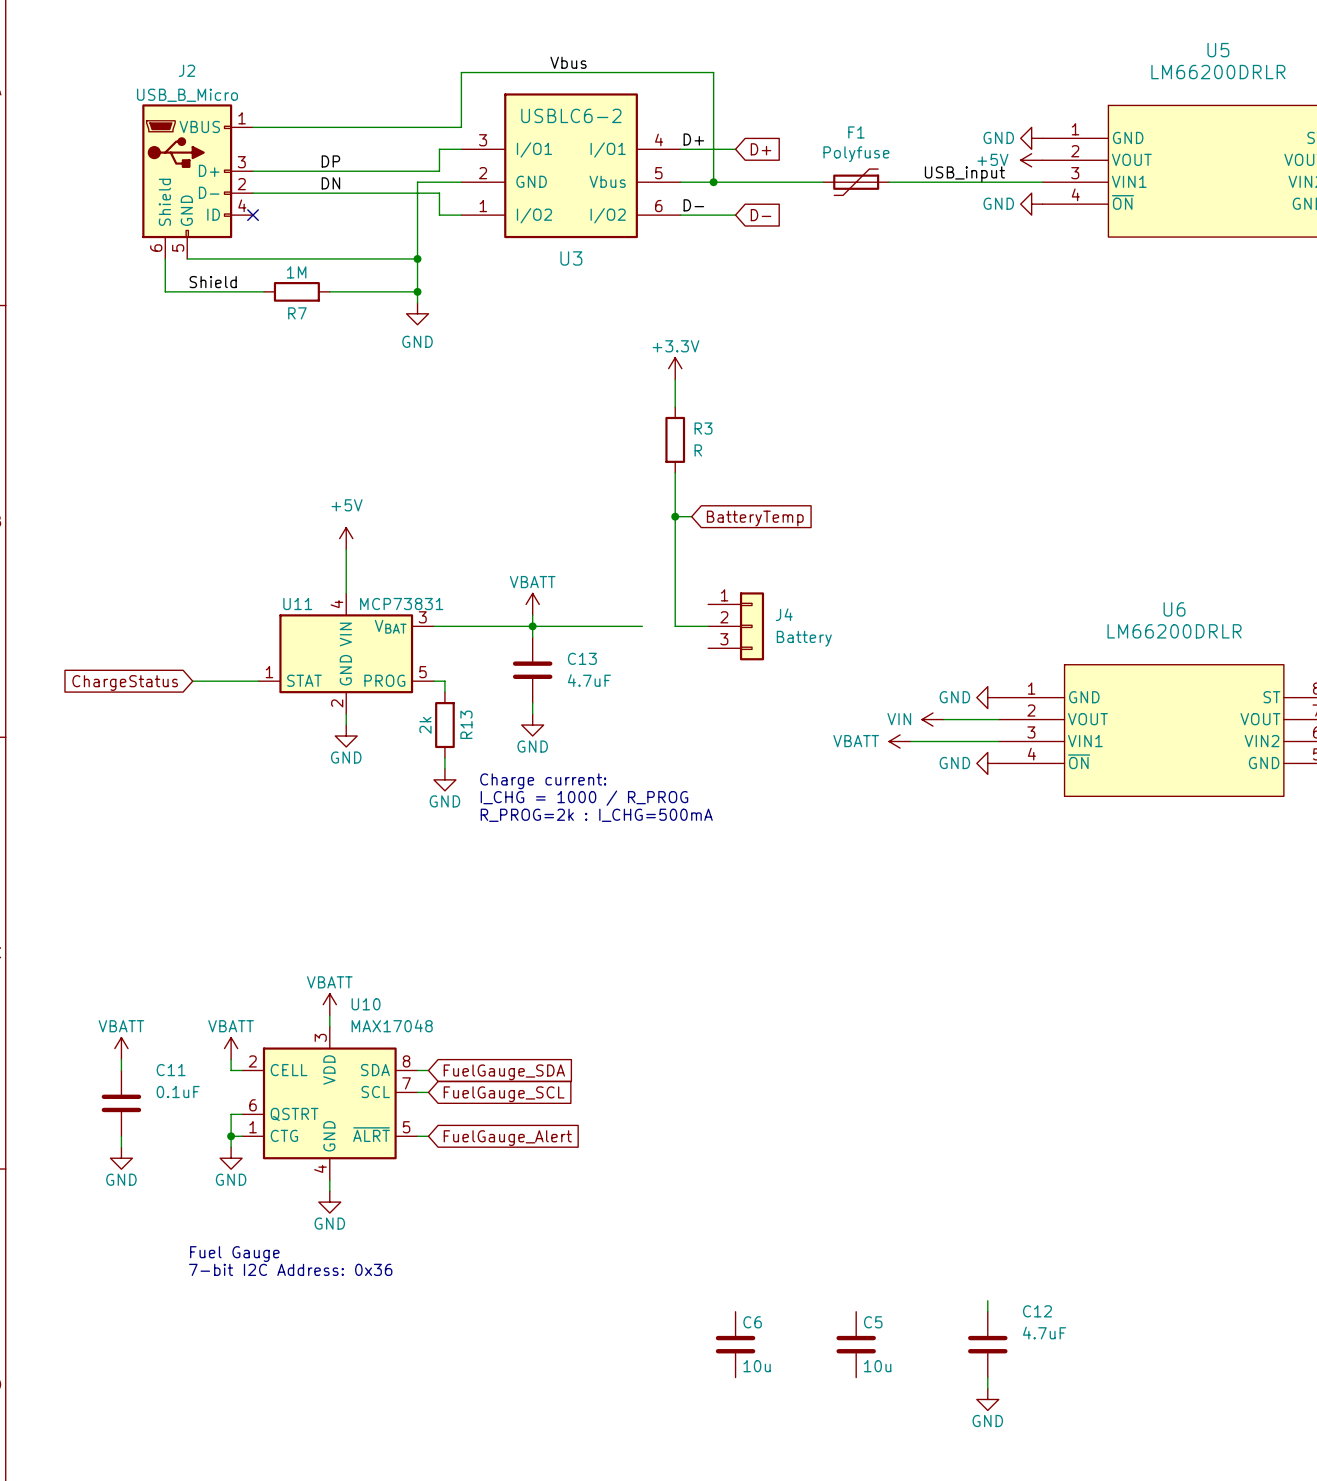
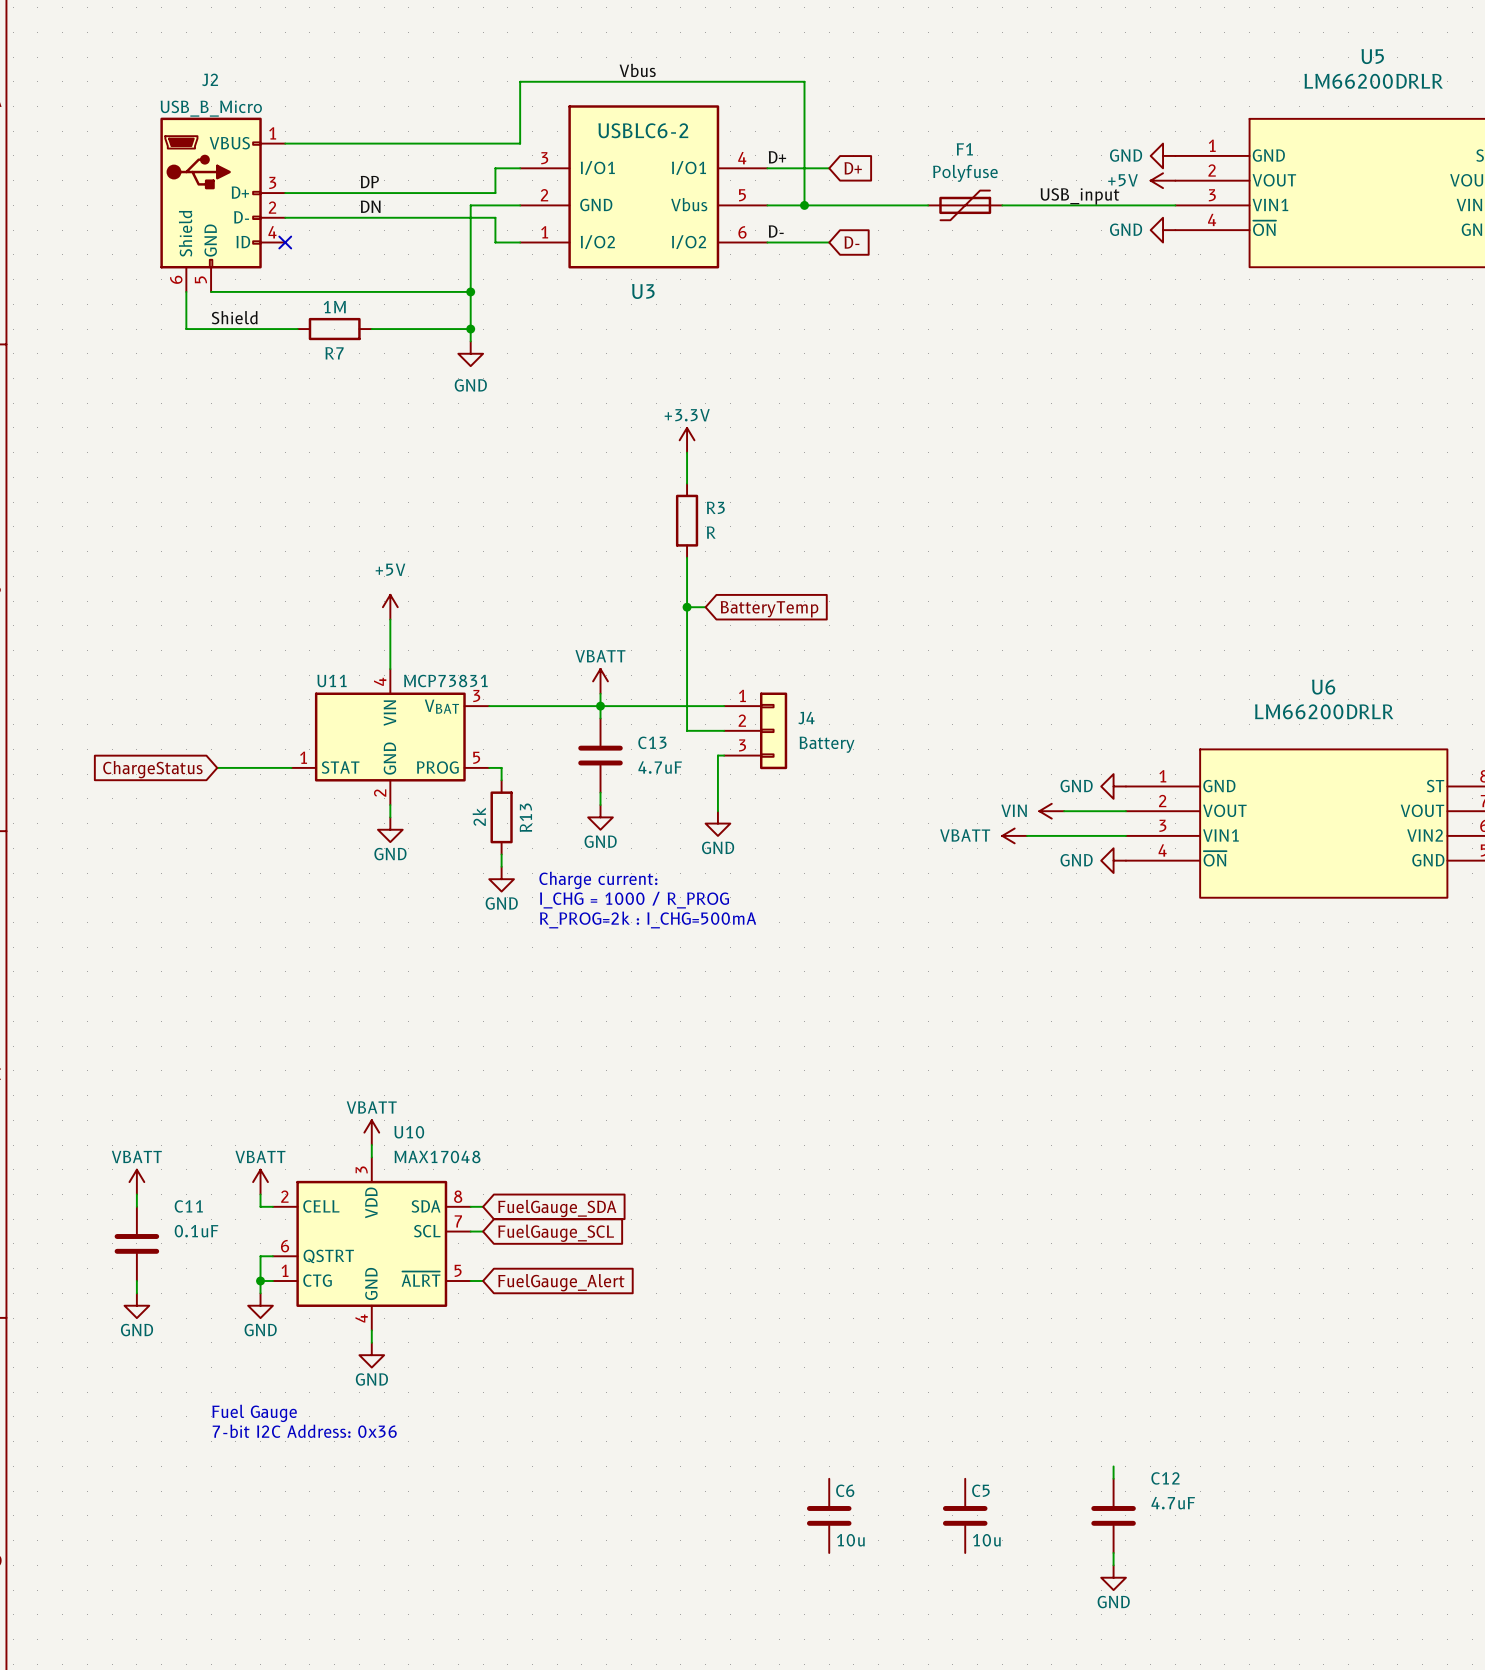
power symbol position: +3.3V (675, 368) -> +3.3V (687, 440)
wire: (675, 379) (675, 407) -> (687, 452) (687, 483)
R3 position: (675, 439) -> (687, 520)
wire: (675, 472) (675, 626) (708, 626) -> (687, 557) (687, 730) (724, 730)
wire: (675, 516) (691, 516) -> (687, 607) (705, 607)
junction: (675, 516) -> none
global label position: BatteryTemp (755, 518) -> BatteryTemp (769, 609)
junction: none -> (687, 607)
J4 position: (736, 626) -> (755, 730)
wire: none -> (724, 755) (717, 755) (717, 811)
power symbol: none -> GND (717, 823)

